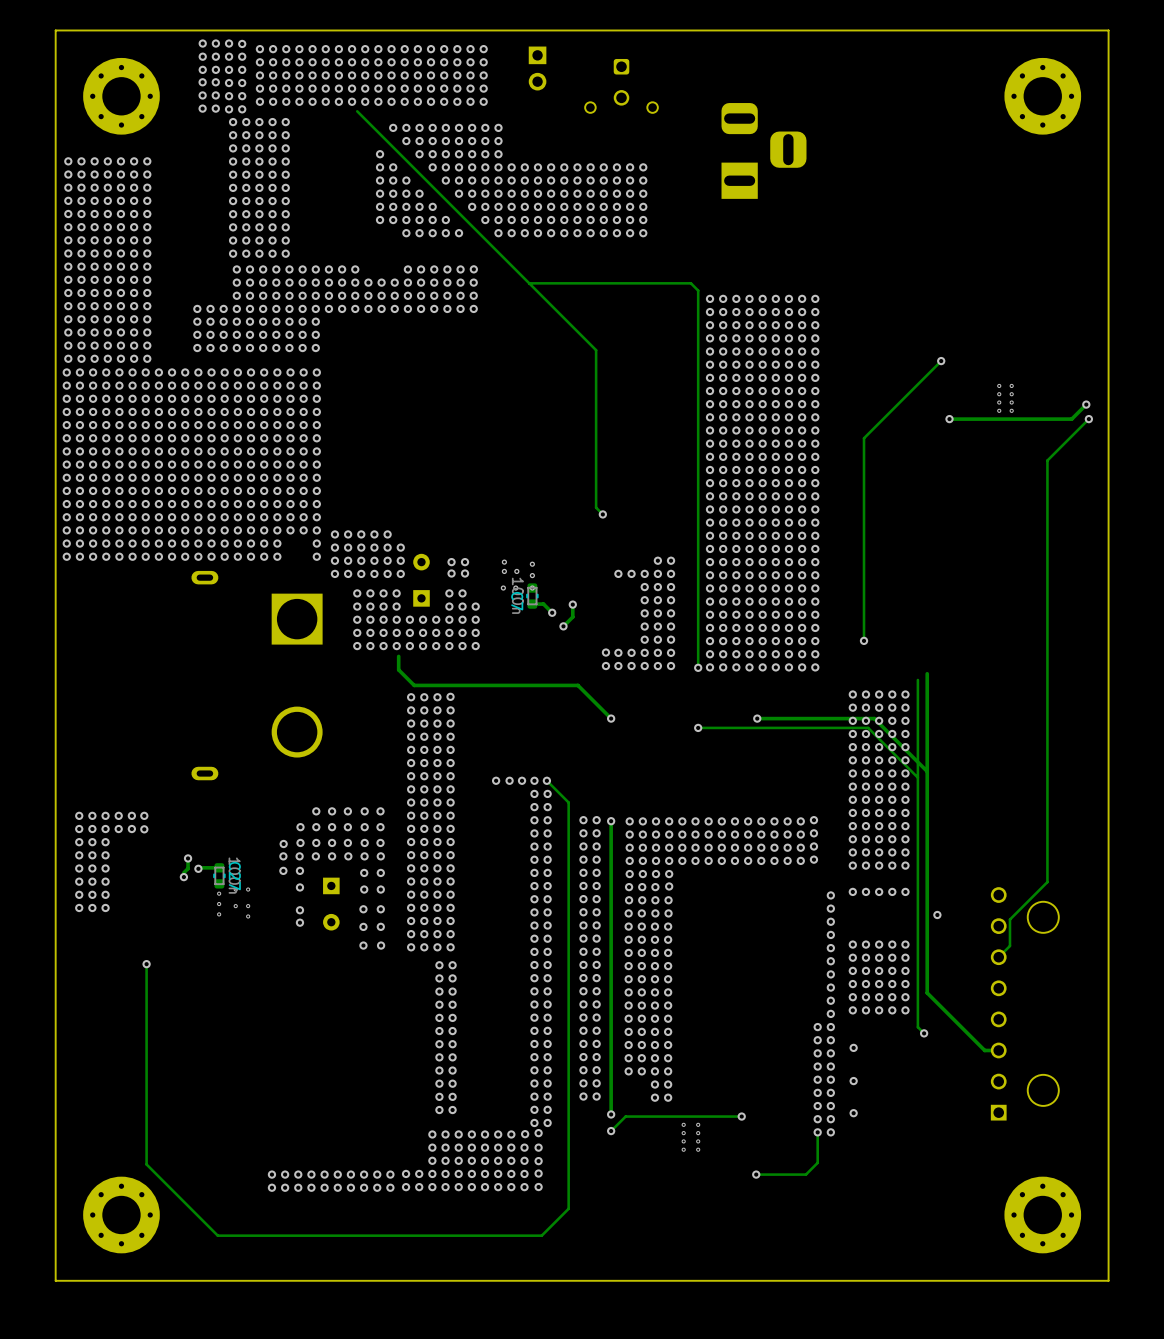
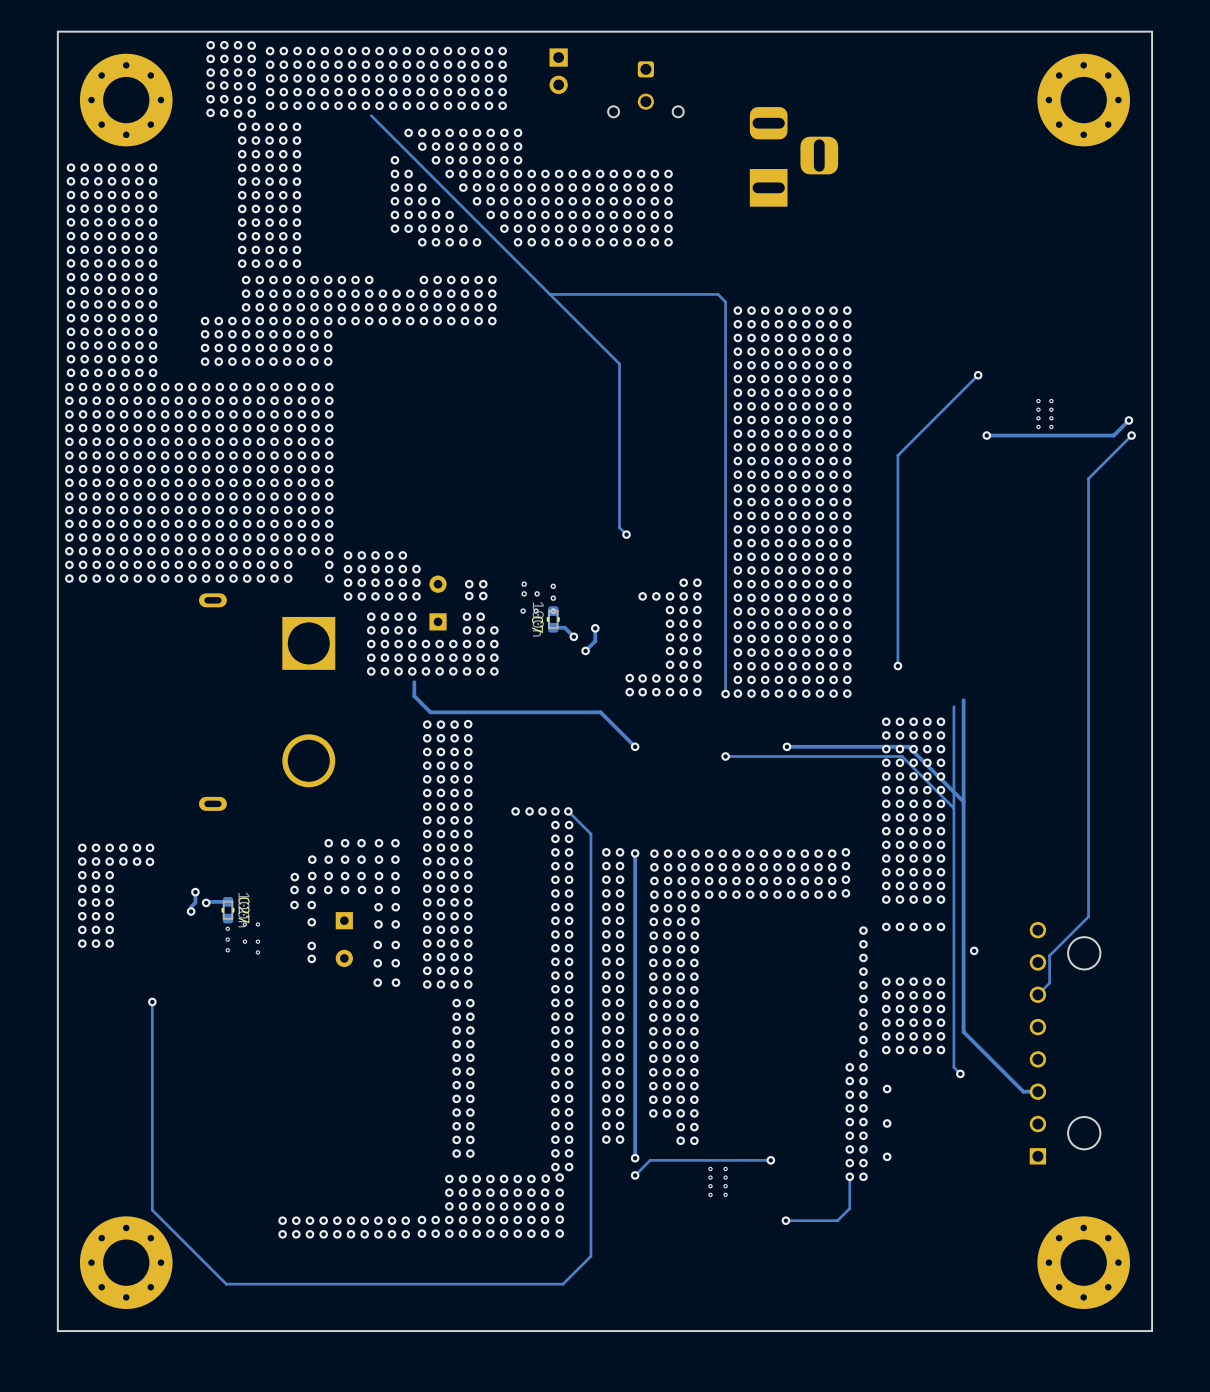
part footprint: [83, 57, 160, 135] -> [79, 53, 173, 147]
part footprint: [1004, 57, 1082, 135] -> [1037, 53, 1131, 147]
part footprint: [83, 1176, 160, 1254] -> [79, 1216, 173, 1309]
part footprint: [1004, 1176, 1082, 1254] -> [1037, 1216, 1131, 1309]

